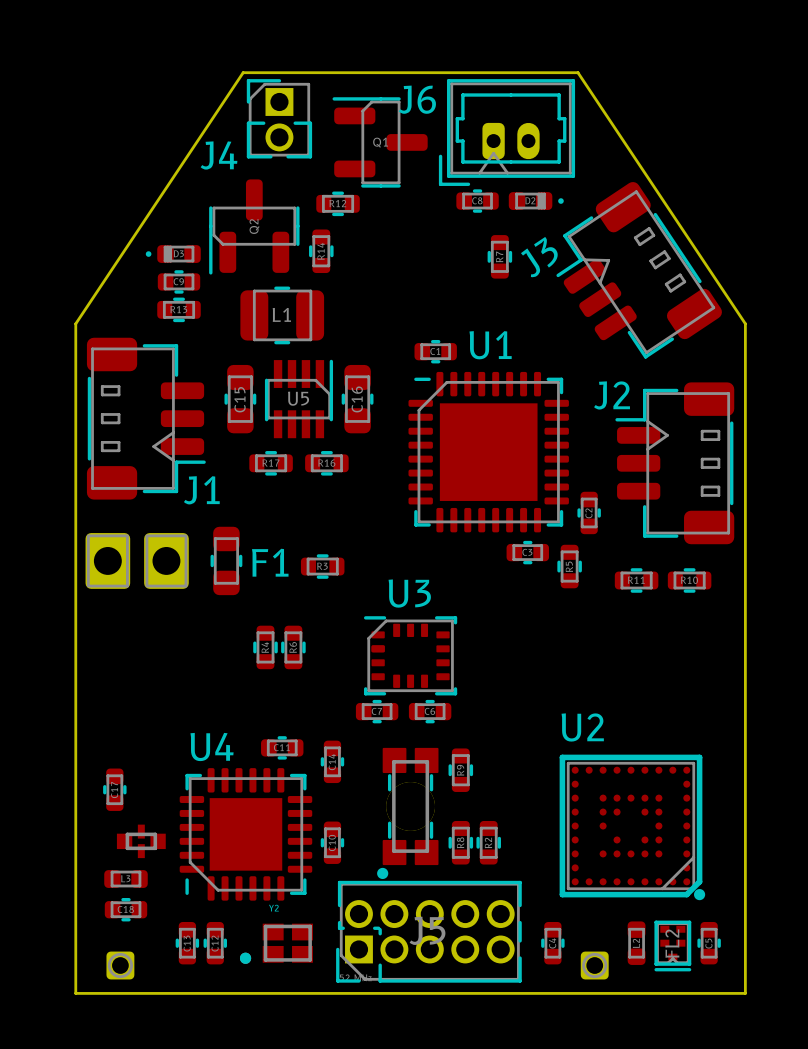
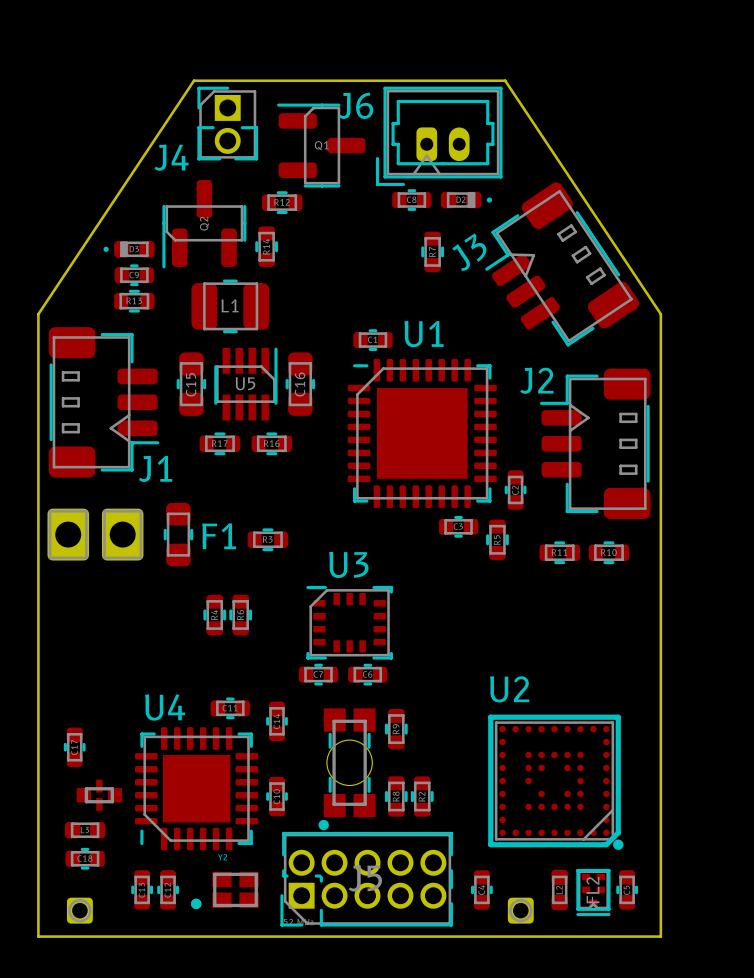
part footprint: [377, 747, 439, 880] -> [318, 708, 376, 831]

